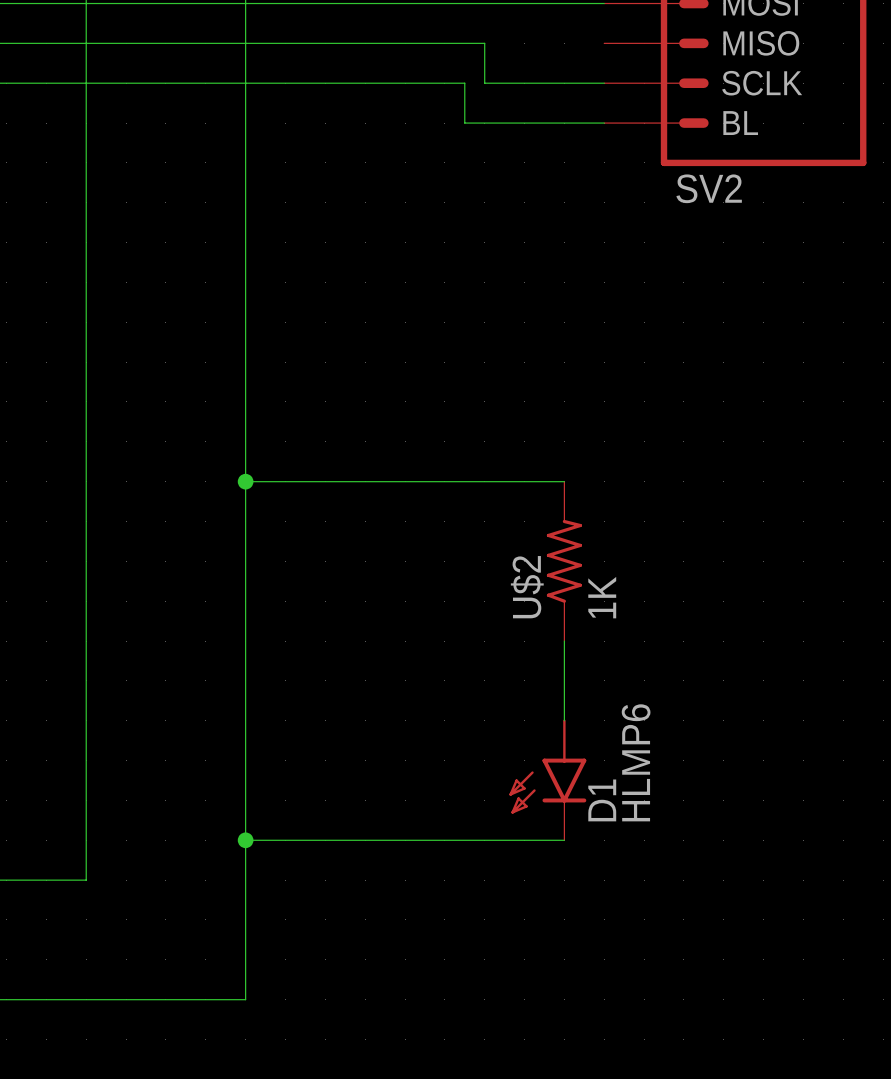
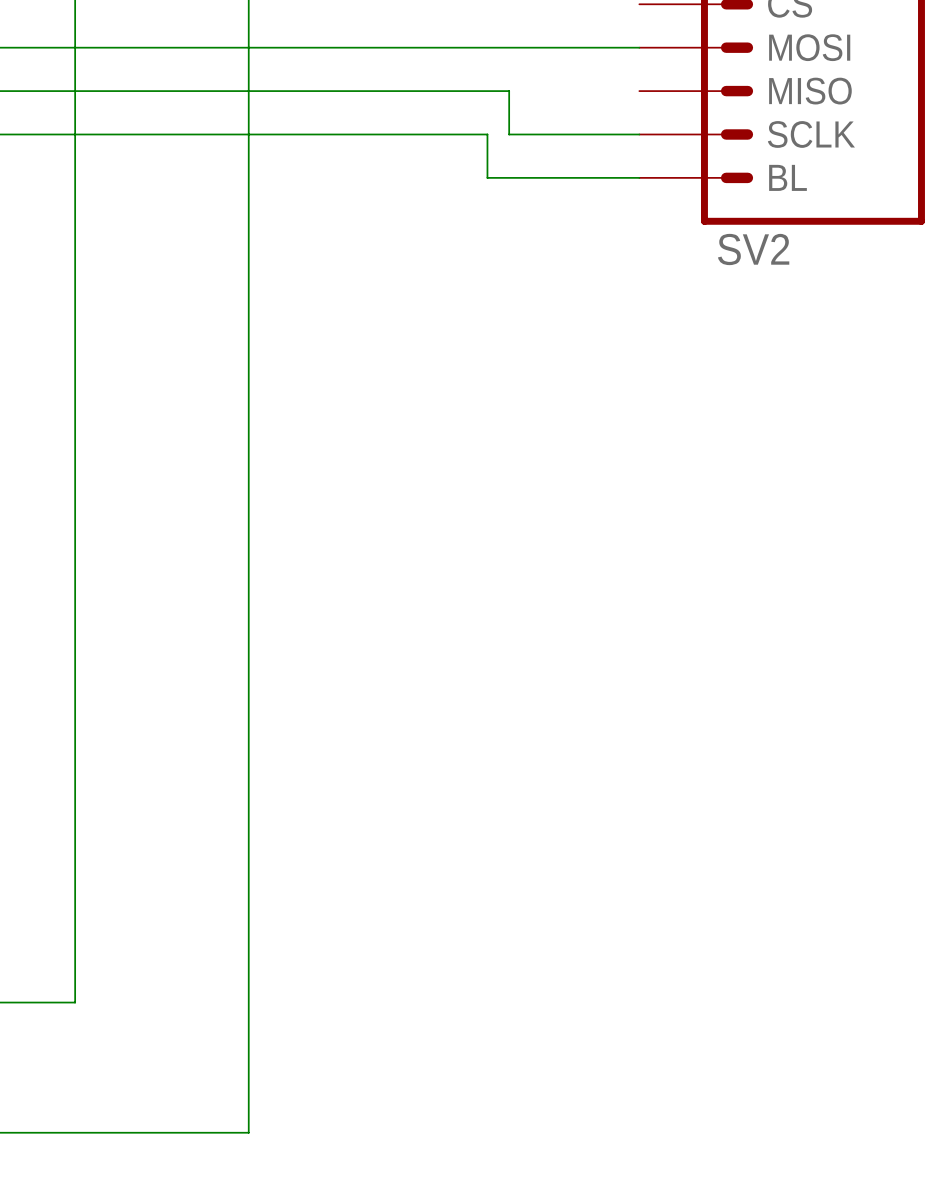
wire: (245, 481) (564, 481) -> none
junction: (245, 481) -> none
U$2: 1K (564, 561) -> none
wire: (564, 641) (564, 720) -> none
D1: HLMP6 (547, 779) -> none
wire: (245, 840) (564, 840) -> none
junction: (245, 840) -> none

